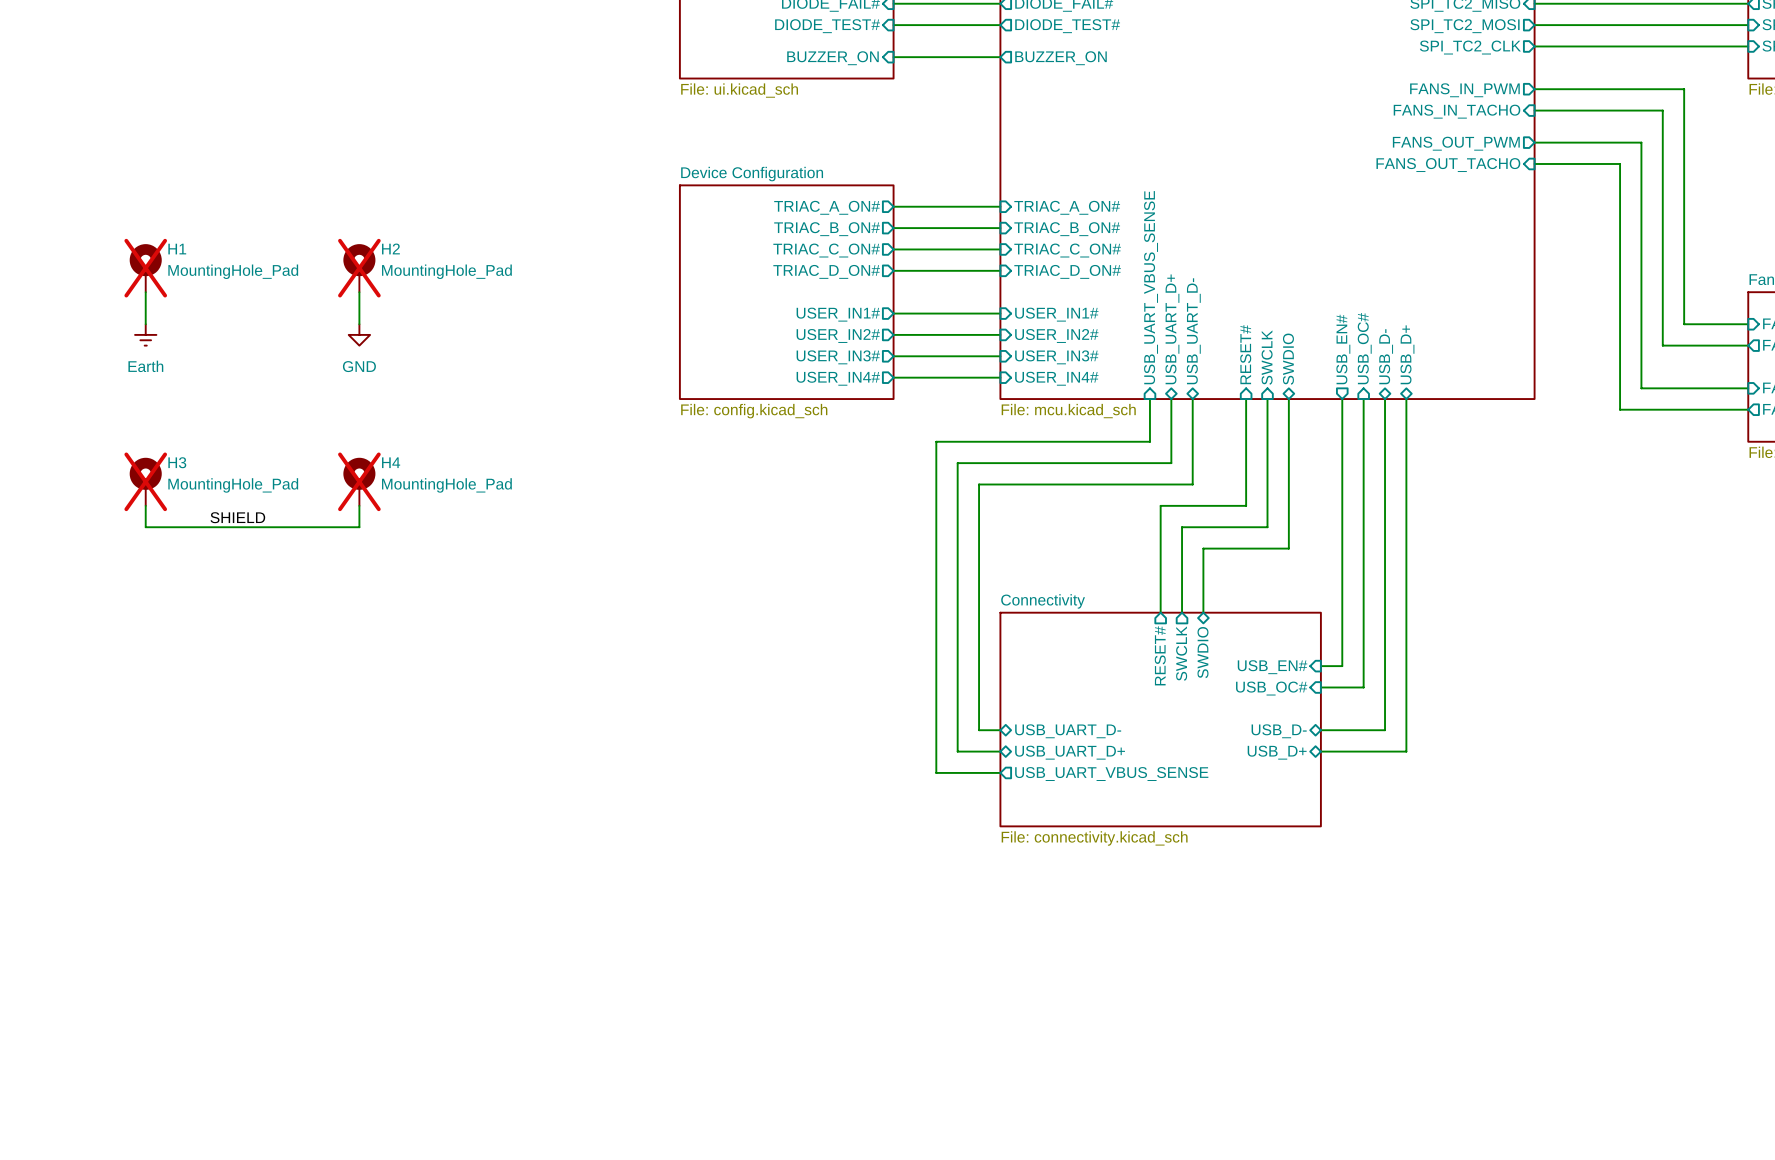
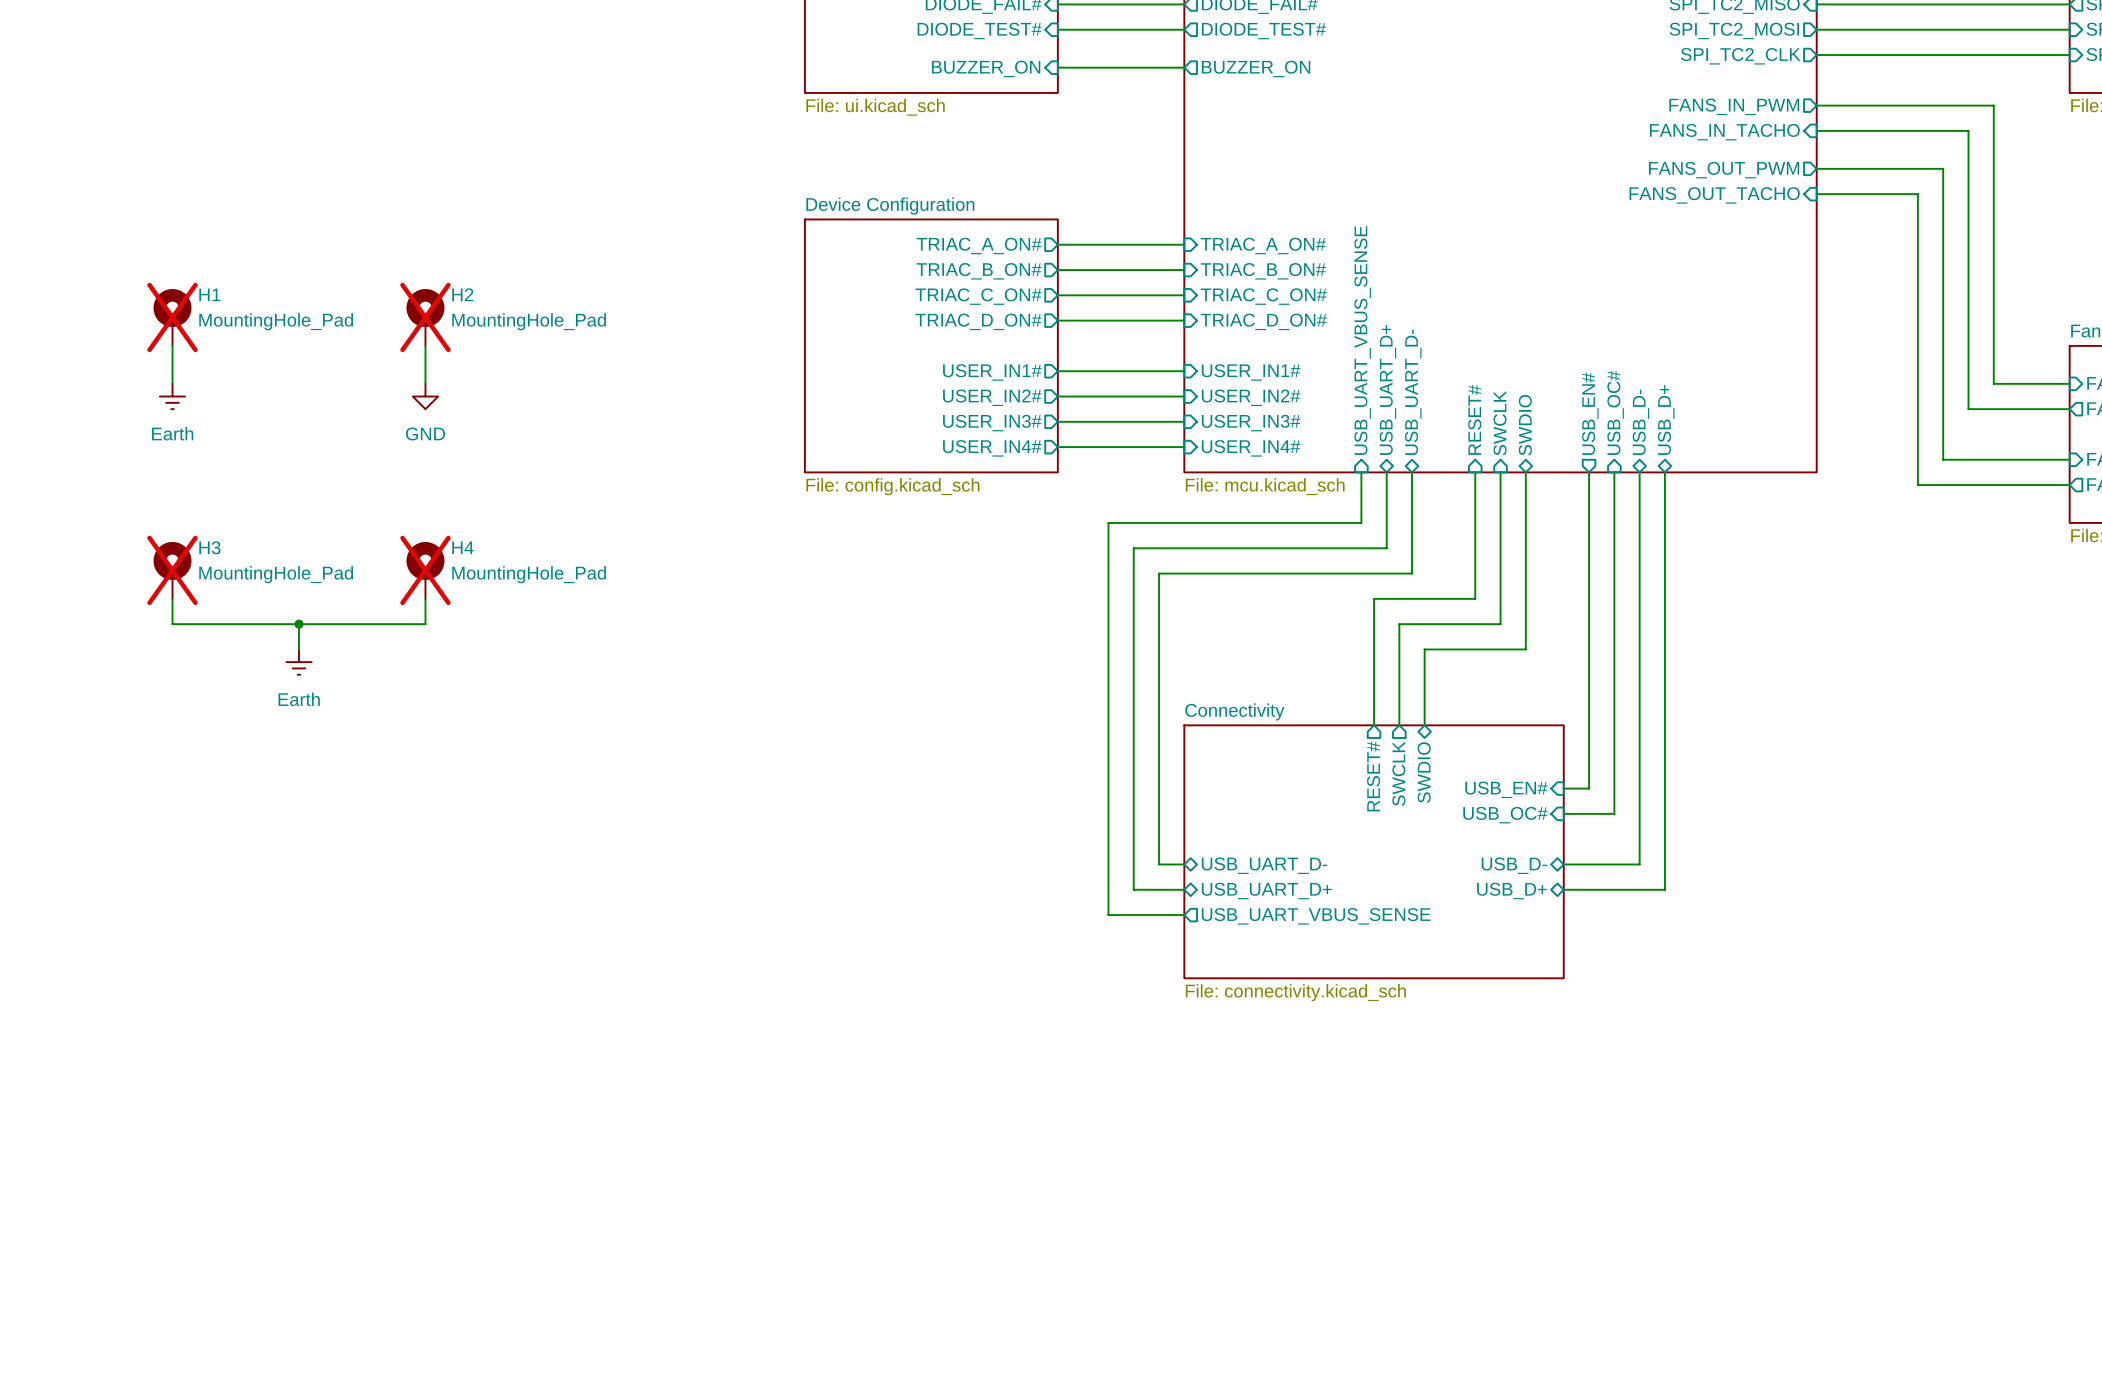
label: SHIELD (237, 517) -> none
wire: none -> (298, 624) (298, 649)
junction: none -> (298, 624)
power symbol: none -> Earth (298, 662)

